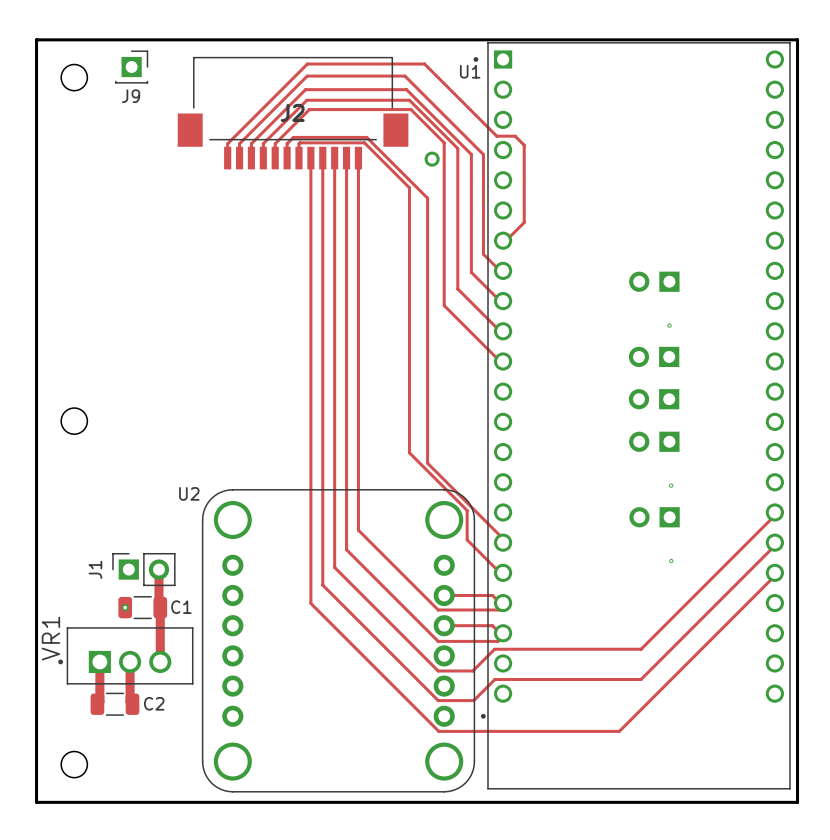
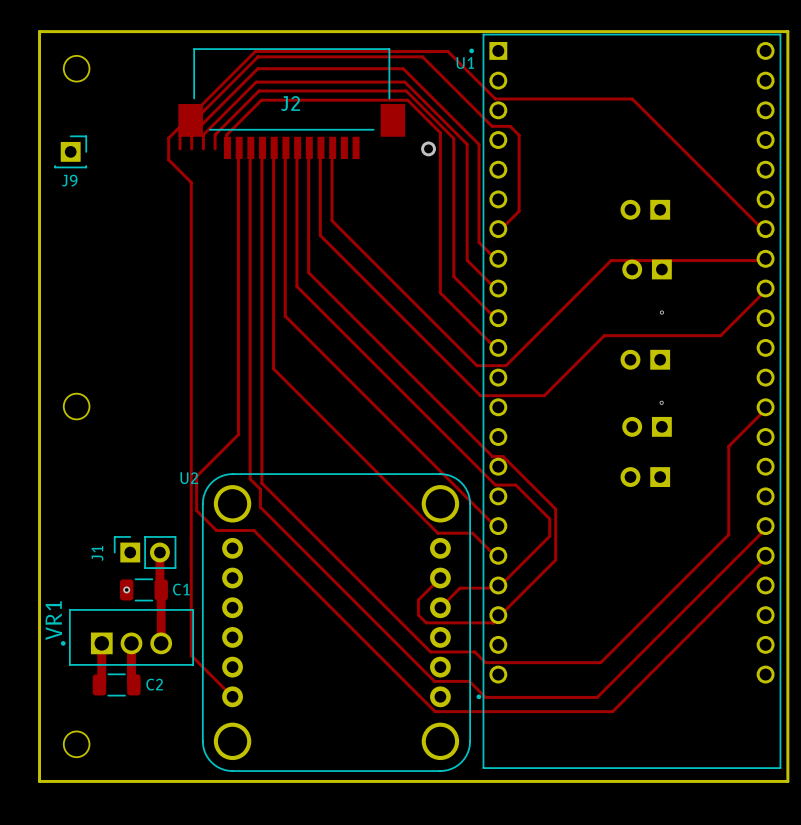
track: (426, 65) (307, 64) (227, 143) (227, 158) -> (422, 56) (258, 56) (180, 134) (180, 148)
J9 position: (131, 67) -> (70, 151)
track: (406, 77) (307, 76) (239, 143) (239, 158) -> (403, 68) (257, 68) (191, 134) (191, 148)
track: (408, 91) (305, 89) (251, 143) (251, 158) -> (404, 82) (256, 82) (203, 134) (203, 148)
track: (306, 100) (263, 143) (263, 158) -> (305, 91) (258, 91) (215, 134) (215, 148)
track: (309, 109) (275, 143) (275, 158) -> (307, 100) (261, 100) (226, 134) (226, 148)
track: (287, 158) (287, 143) (293, 137) (366, 137) (427, 198) (427, 463) (503, 538) -> none
track: (299, 158) (299, 142) (364, 142) (409, 187) (409, 452) (467, 510) (467, 539) (503, 575) -> none
track: (310, 158) (310, 603) -> (238, 148) (238, 434) (196, 476) (196, 510) (216, 530) (253, 530) (309, 585)
track: (322, 158) (322, 585) -> (250, 148) (250, 479) (260, 489) (260, 507) (321, 567)
track: (334, 158) (334, 567) (438, 670) (472, 670) (494, 649) (641, 649) (774, 515) -> none
track: (346, 158) (346, 549) (438, 641) (497, 641) -> none
track: (358, 158) (358, 530) (438, 609) (499, 609) -> none
track: none -> (261, 148) (261, 483) (430, 651) (474, 651) (485, 662) (600, 662) (728, 534) (728, 446) (765, 409)
track: none -> (273, 148) (273, 368) (437, 533) (472, 533) (497, 558)
track: none -> (285, 148) (285, 316) (497, 528)
track: none -> (320, 148) (320, 235) (480, 395) (544, 395) (604, 335) (720, 335) (765, 291)
track: none -> (332, 148) (332, 220) (476, 365) (506, 365) (611, 260) (765, 261)
part: none -> (645, 209)
track: none -> (765, 231) (632, 99) (495, 99) (447, 51) (255, 51) (168, 138) (168, 159) (191, 182) (191, 655) (232, 696)
part: (654, 356) -> none
part: none -> (645, 359)
part: (654, 399) -> none
via position: (671, 485) -> (661, 402)
part position: (654, 517) -> (645, 477)
via: (671, 561) -> none
track: (444, 595) (492, 595) (503, 606) -> (440, 578) (418, 600) (418, 615) (426, 622) (492, 622) (555, 560) (555, 509) (503, 456) (492, 456) (308, 272) (308, 148)
track: (444, 625) (492, 625) (503, 636) -> (440, 607) (459, 588) (497, 588) (549, 536) (549, 518) (515, 485) (495, 485) (296, 286) (296, 148)
track: (641, 679) (494, 679) (473, 700) -> (634, 660) (597, 697) (485, 697) (469, 681)

